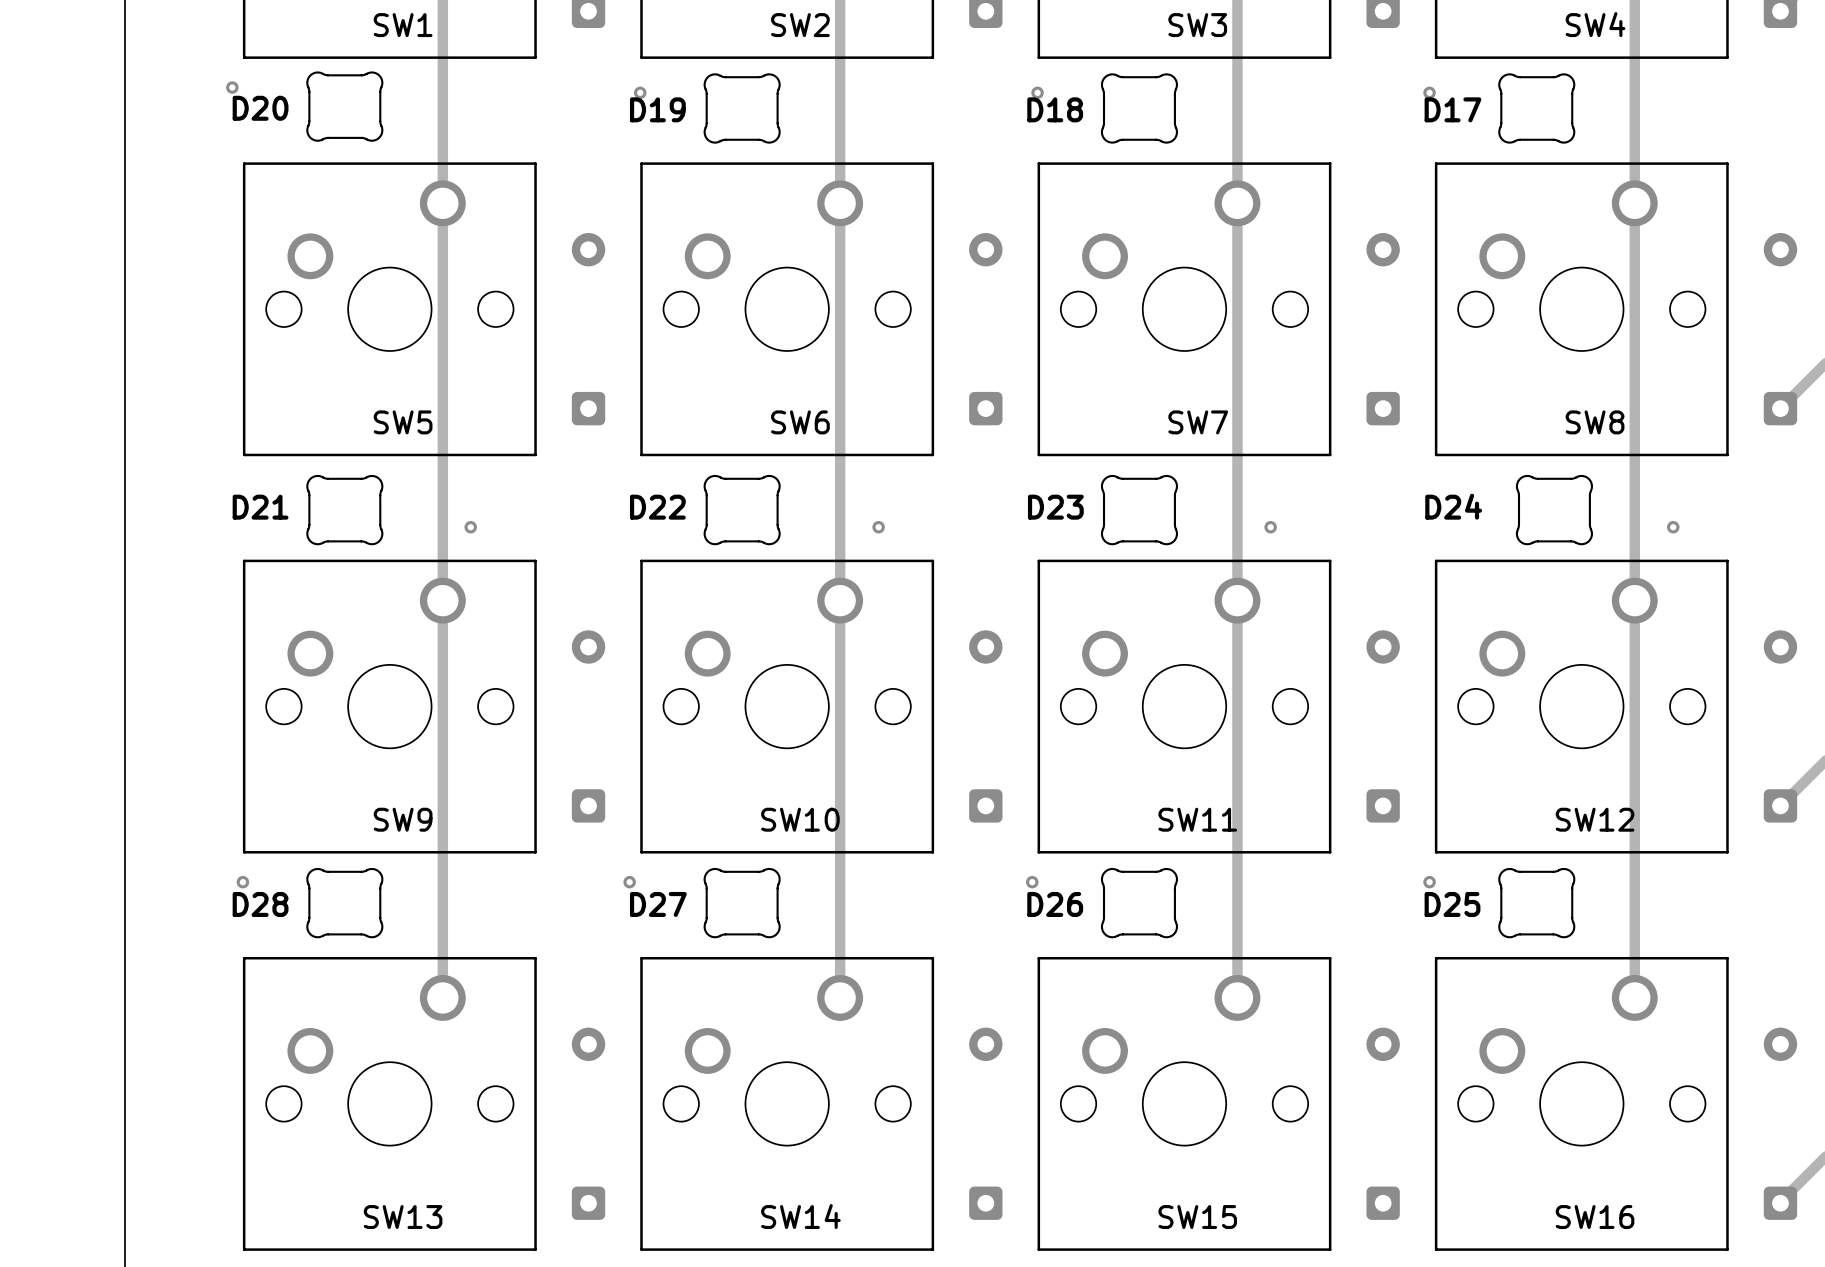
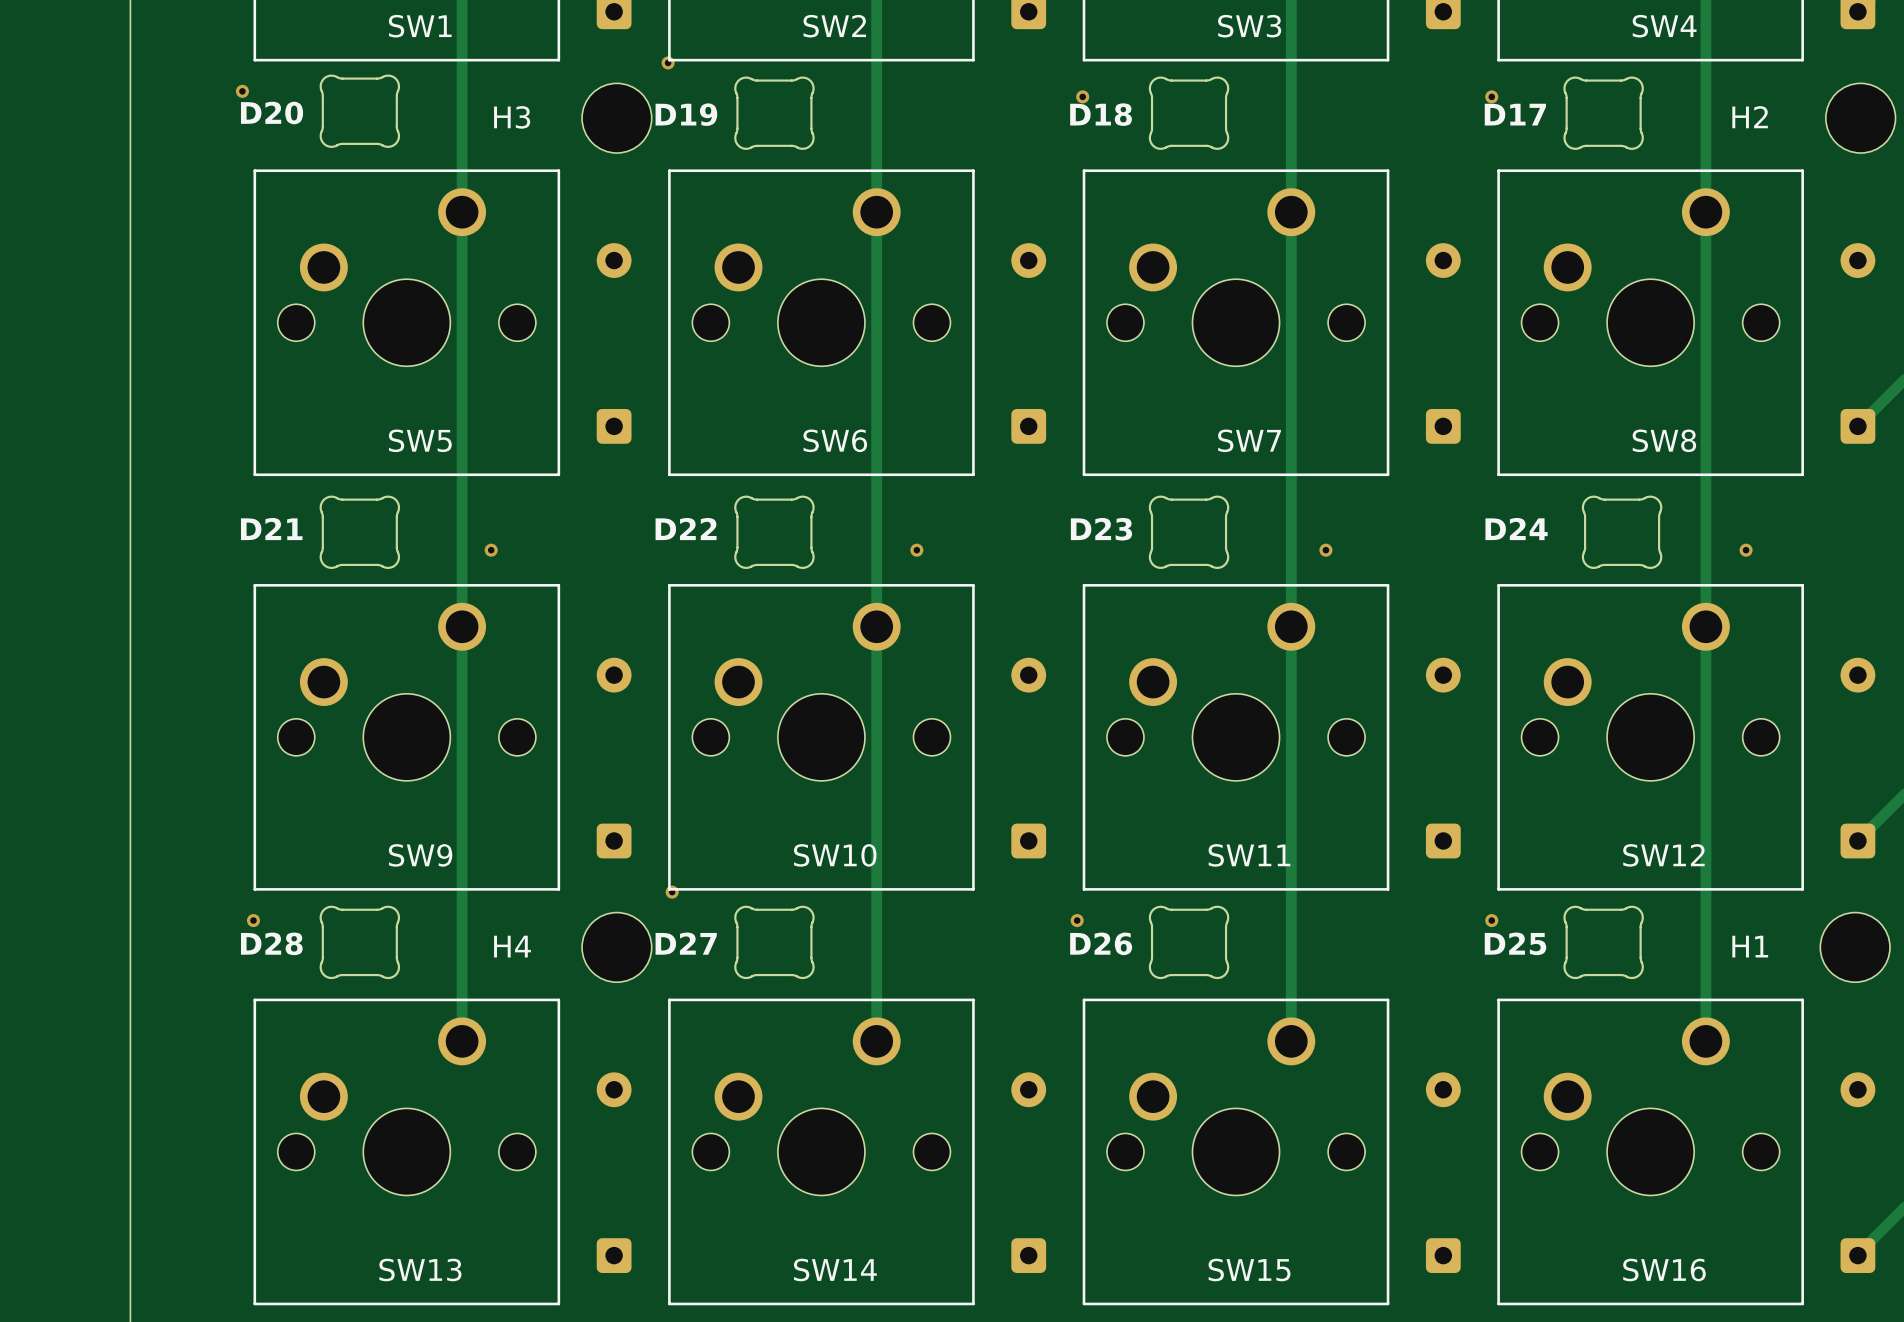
via position: (640, 92) -> (668, 62)
H3: none -> (616, 118)
H2: none -> (1860, 118)
via position: (629, 882) -> (672, 892)
H4: none -> (616, 947)
H1: none -> (1855, 947)

